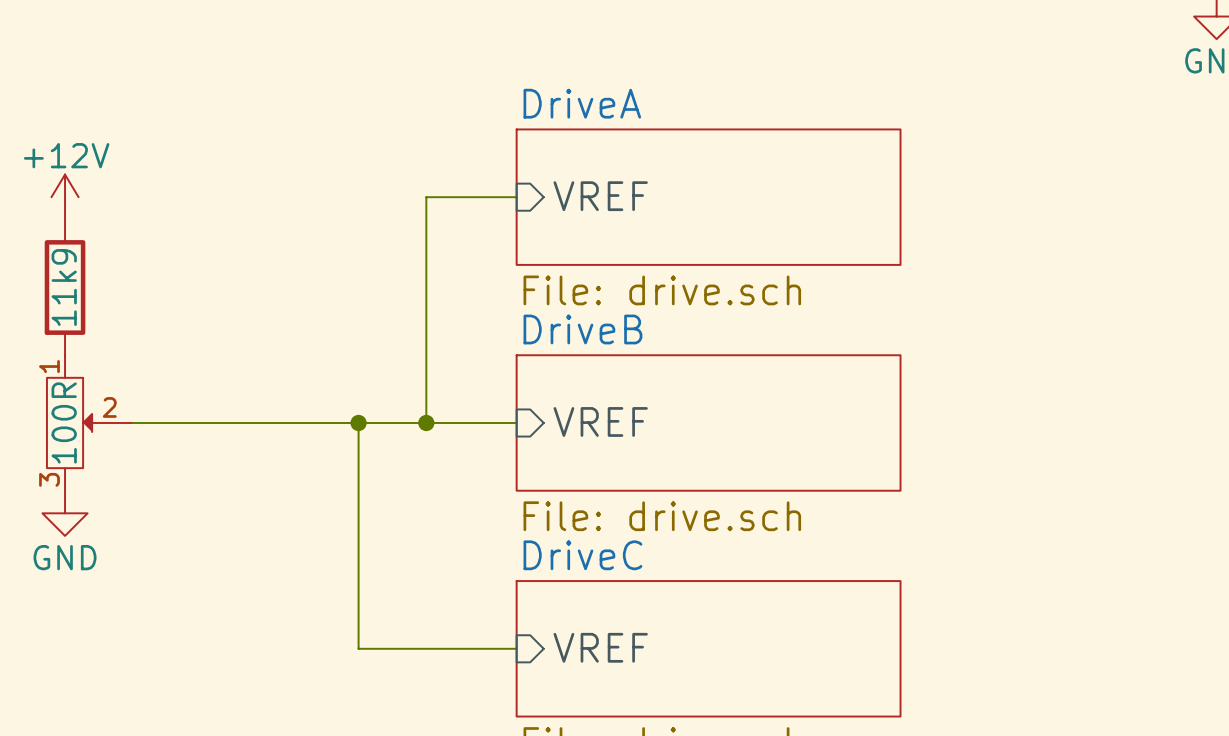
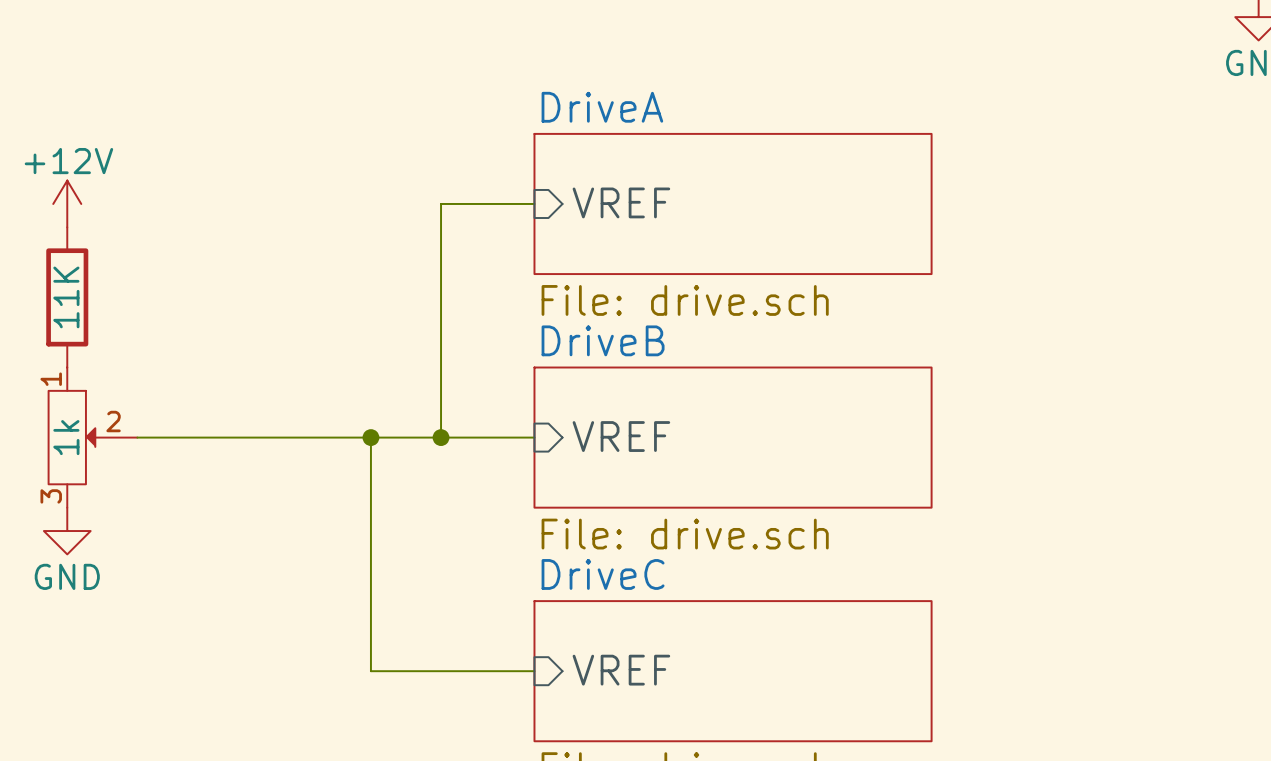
part value: 11k9 (64, 287) -> 11K (66, 297)
part value: 100R (64, 422) -> 1k (66, 437)

